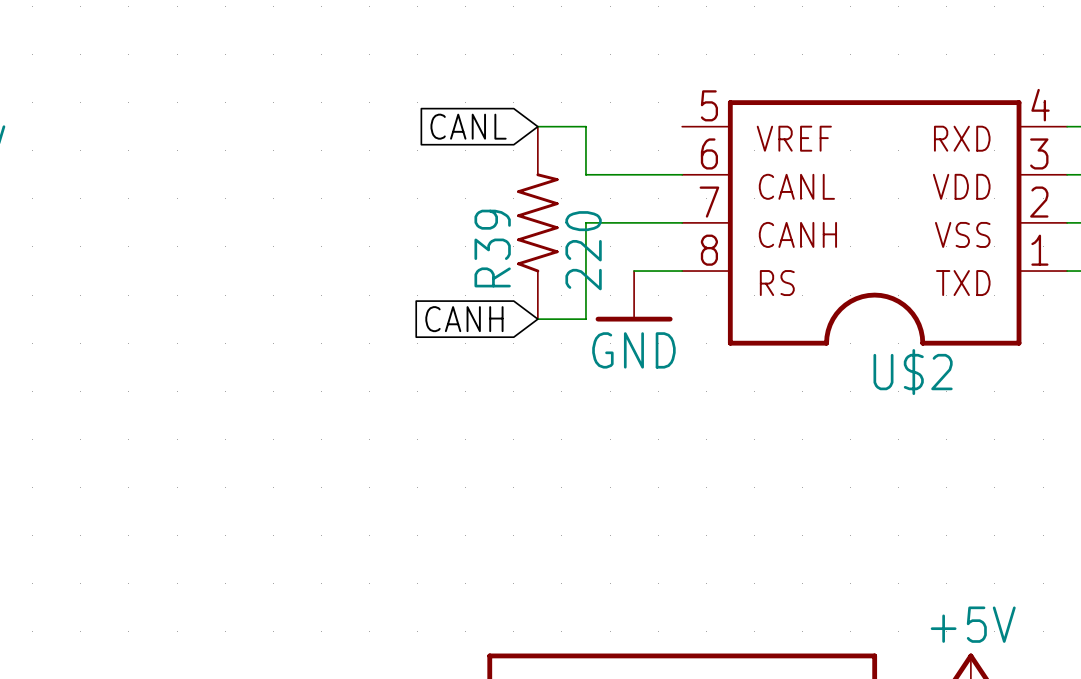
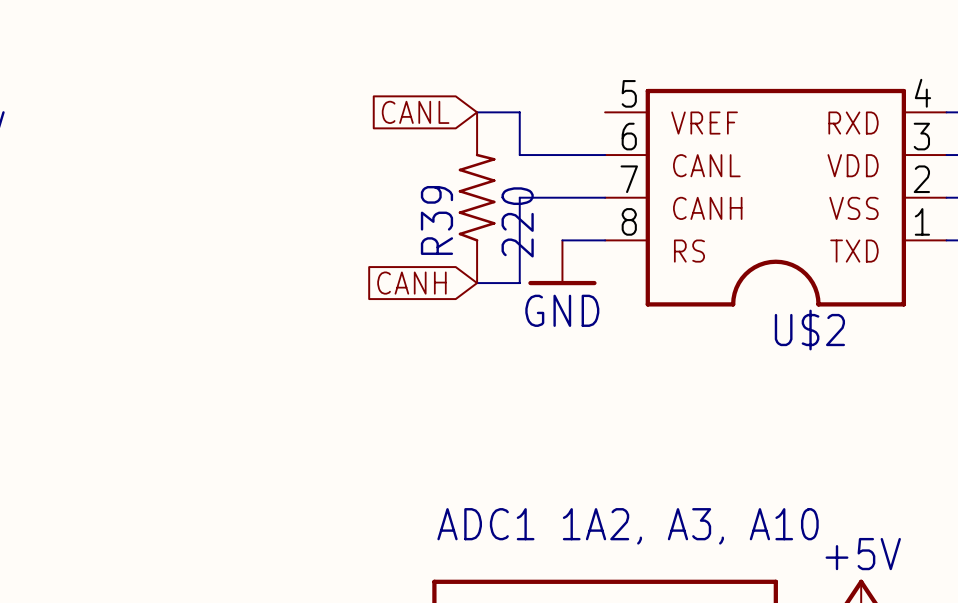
text: none -> ADC1 1A2, A3, A10 (628, 526)

